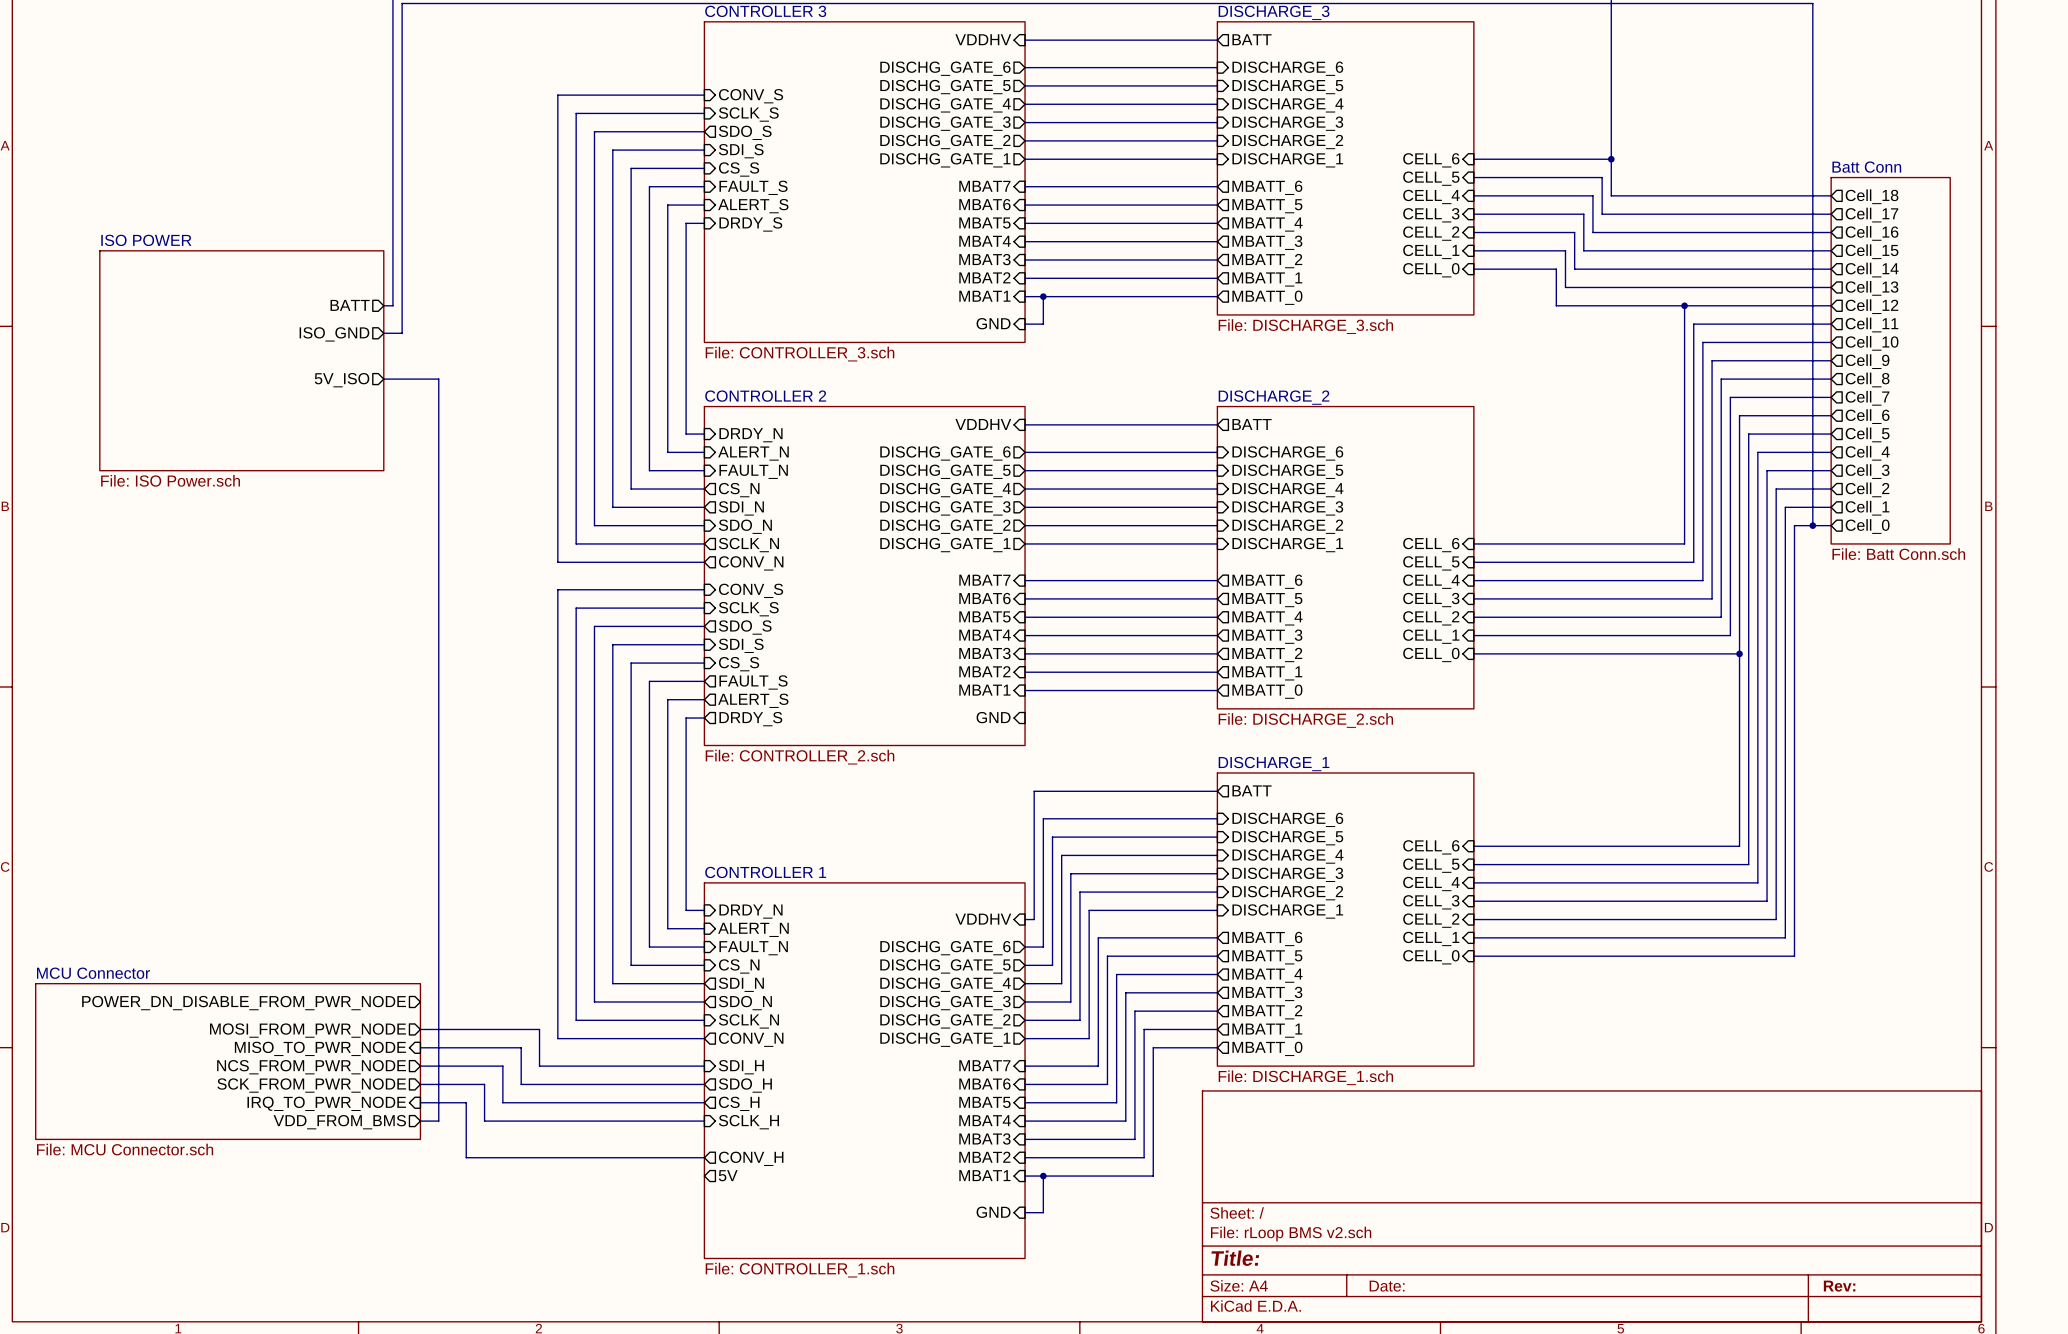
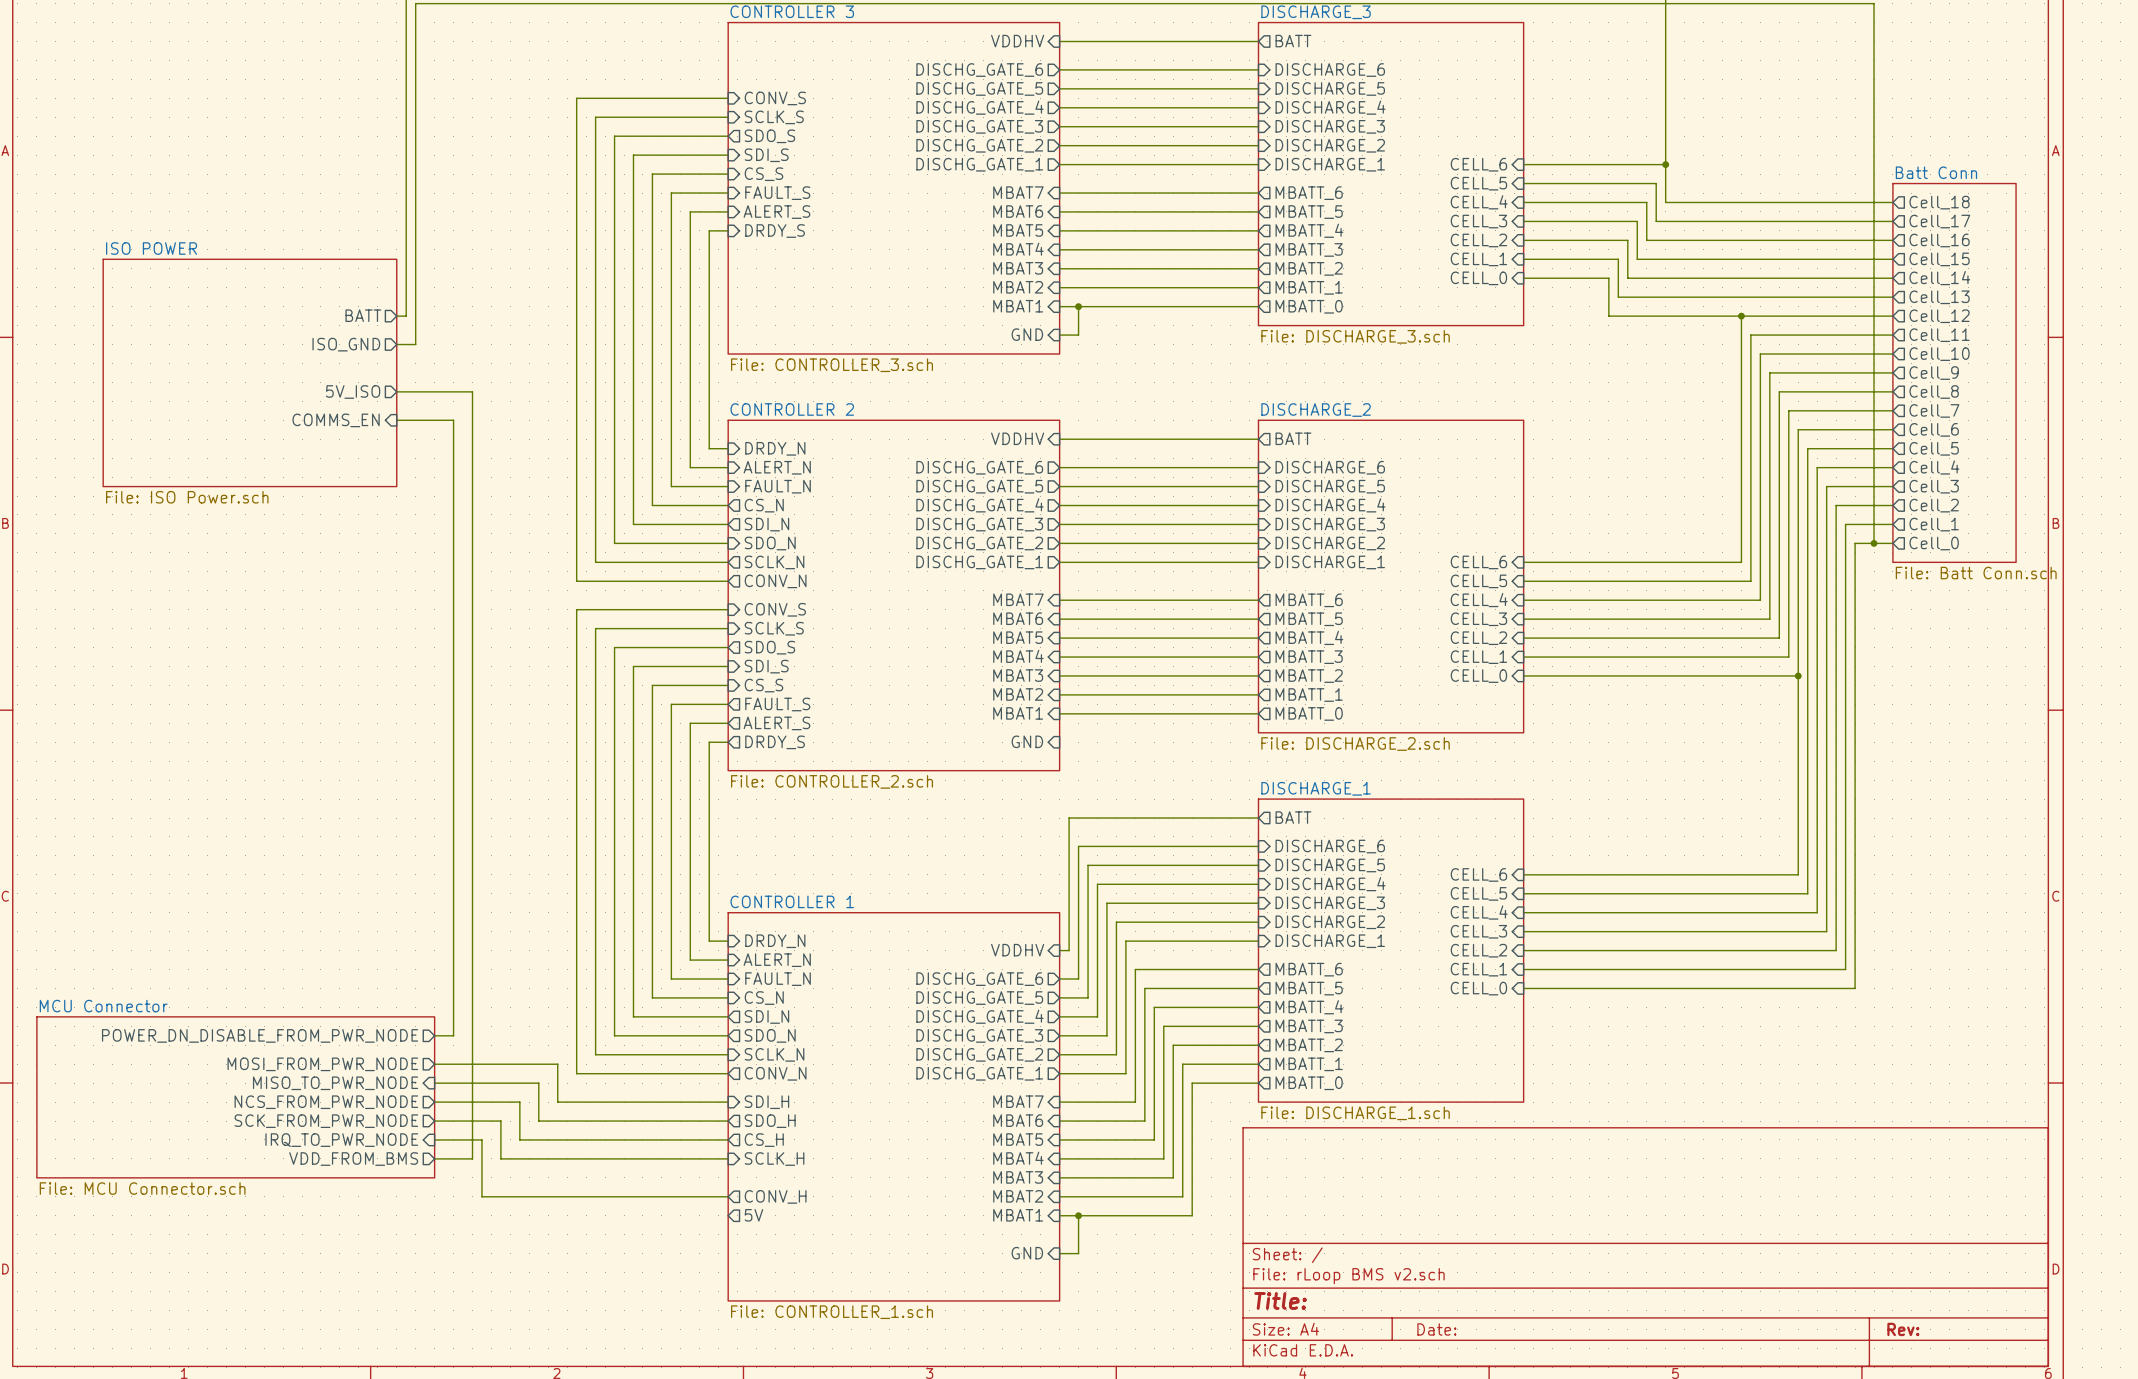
wire: (438, 379) (438, 406) -> (396, 420) (453, 420)
wire: none -> (453, 391) (472, 391) (472, 1158) (453, 1158)
sheet pin: none -> COMMS_EN (336, 420)
wire: (438, 1001) (438, 1121) -> (453, 1035) (434, 1035)

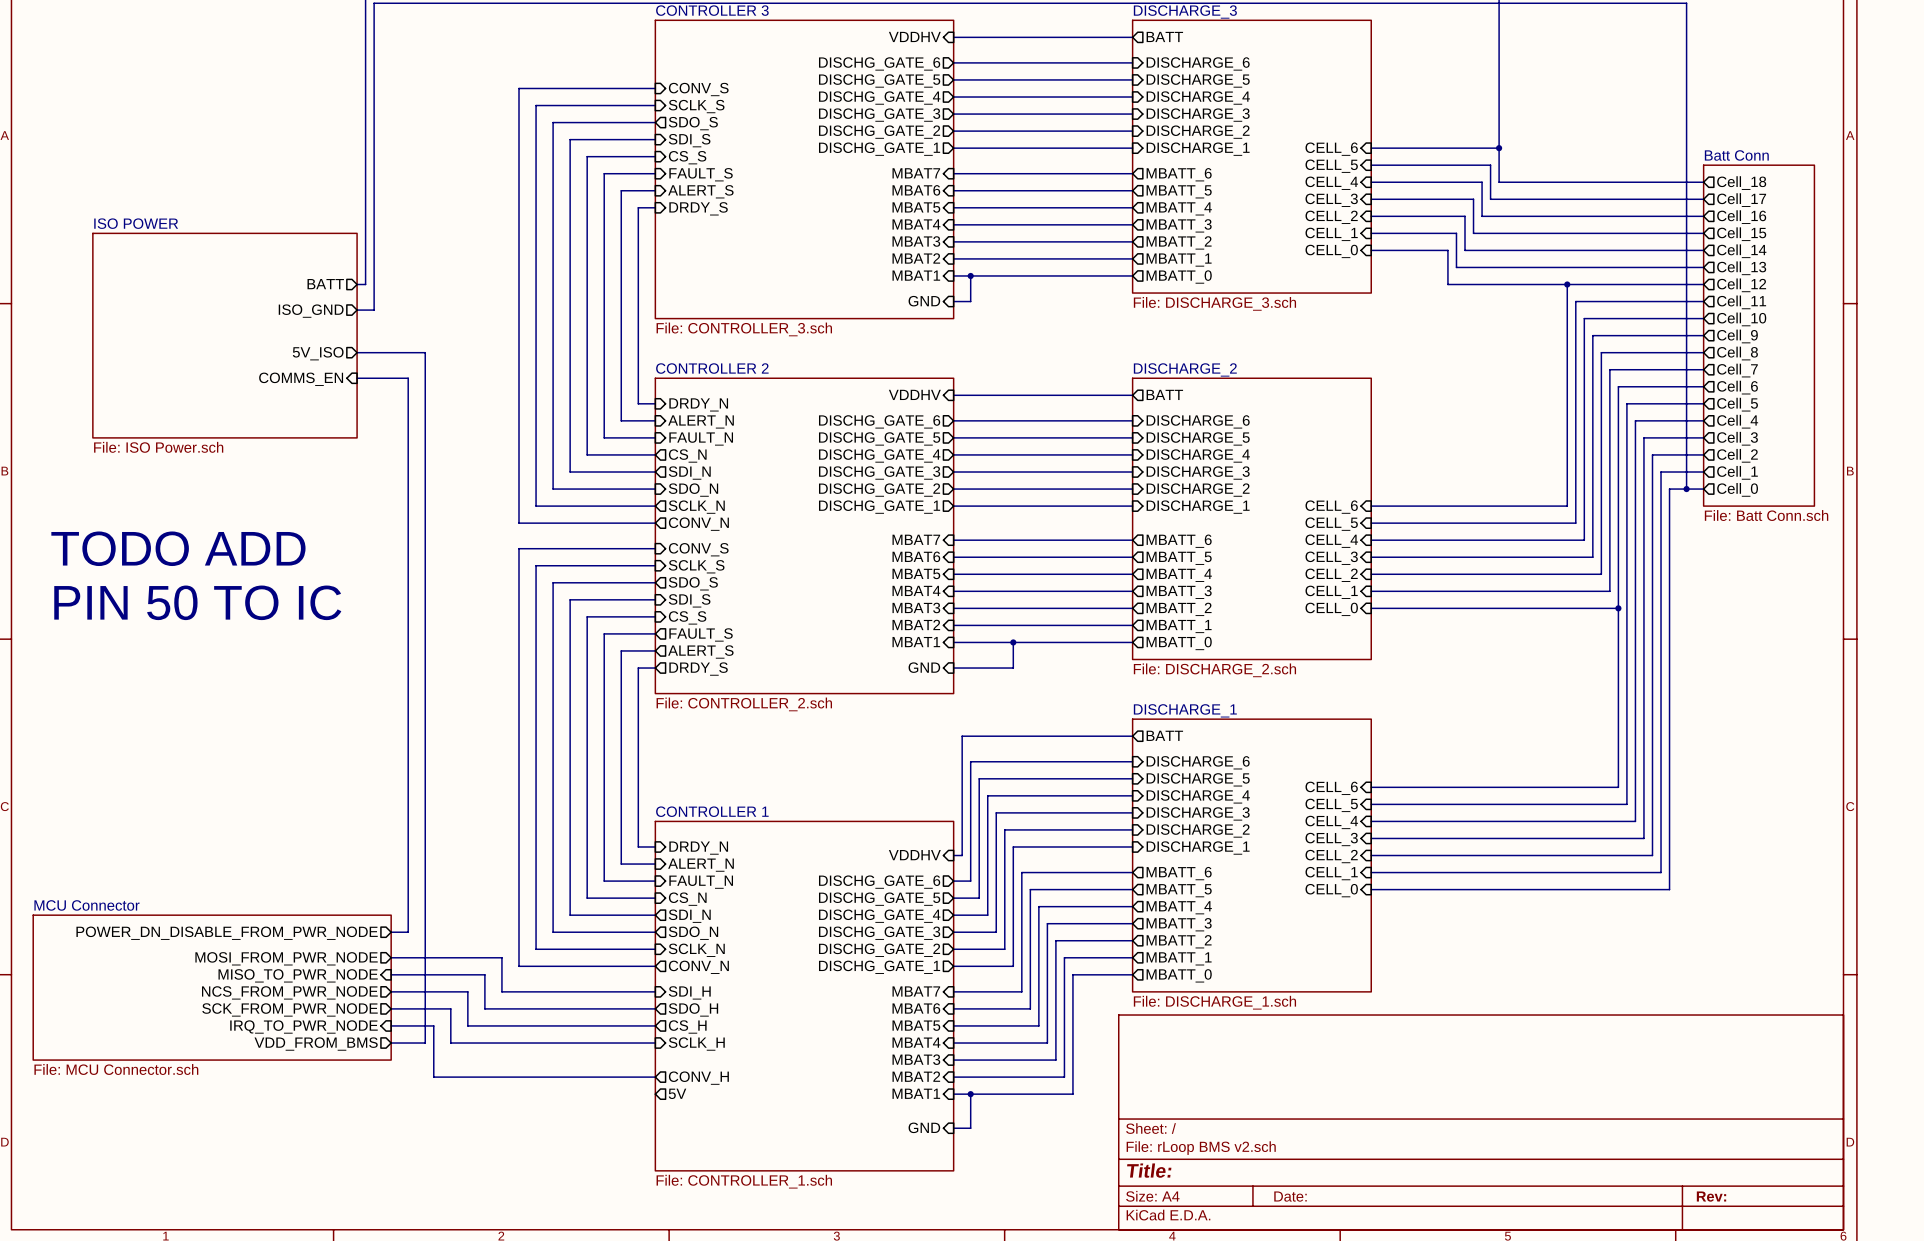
text: none -> TODO ADD (178, 548)
text: none -> PIN 50 TO IC (197, 602)
wire: none -> (1013, 642) (1013, 668) (953, 668)
junction: none -> (1013, 642)

